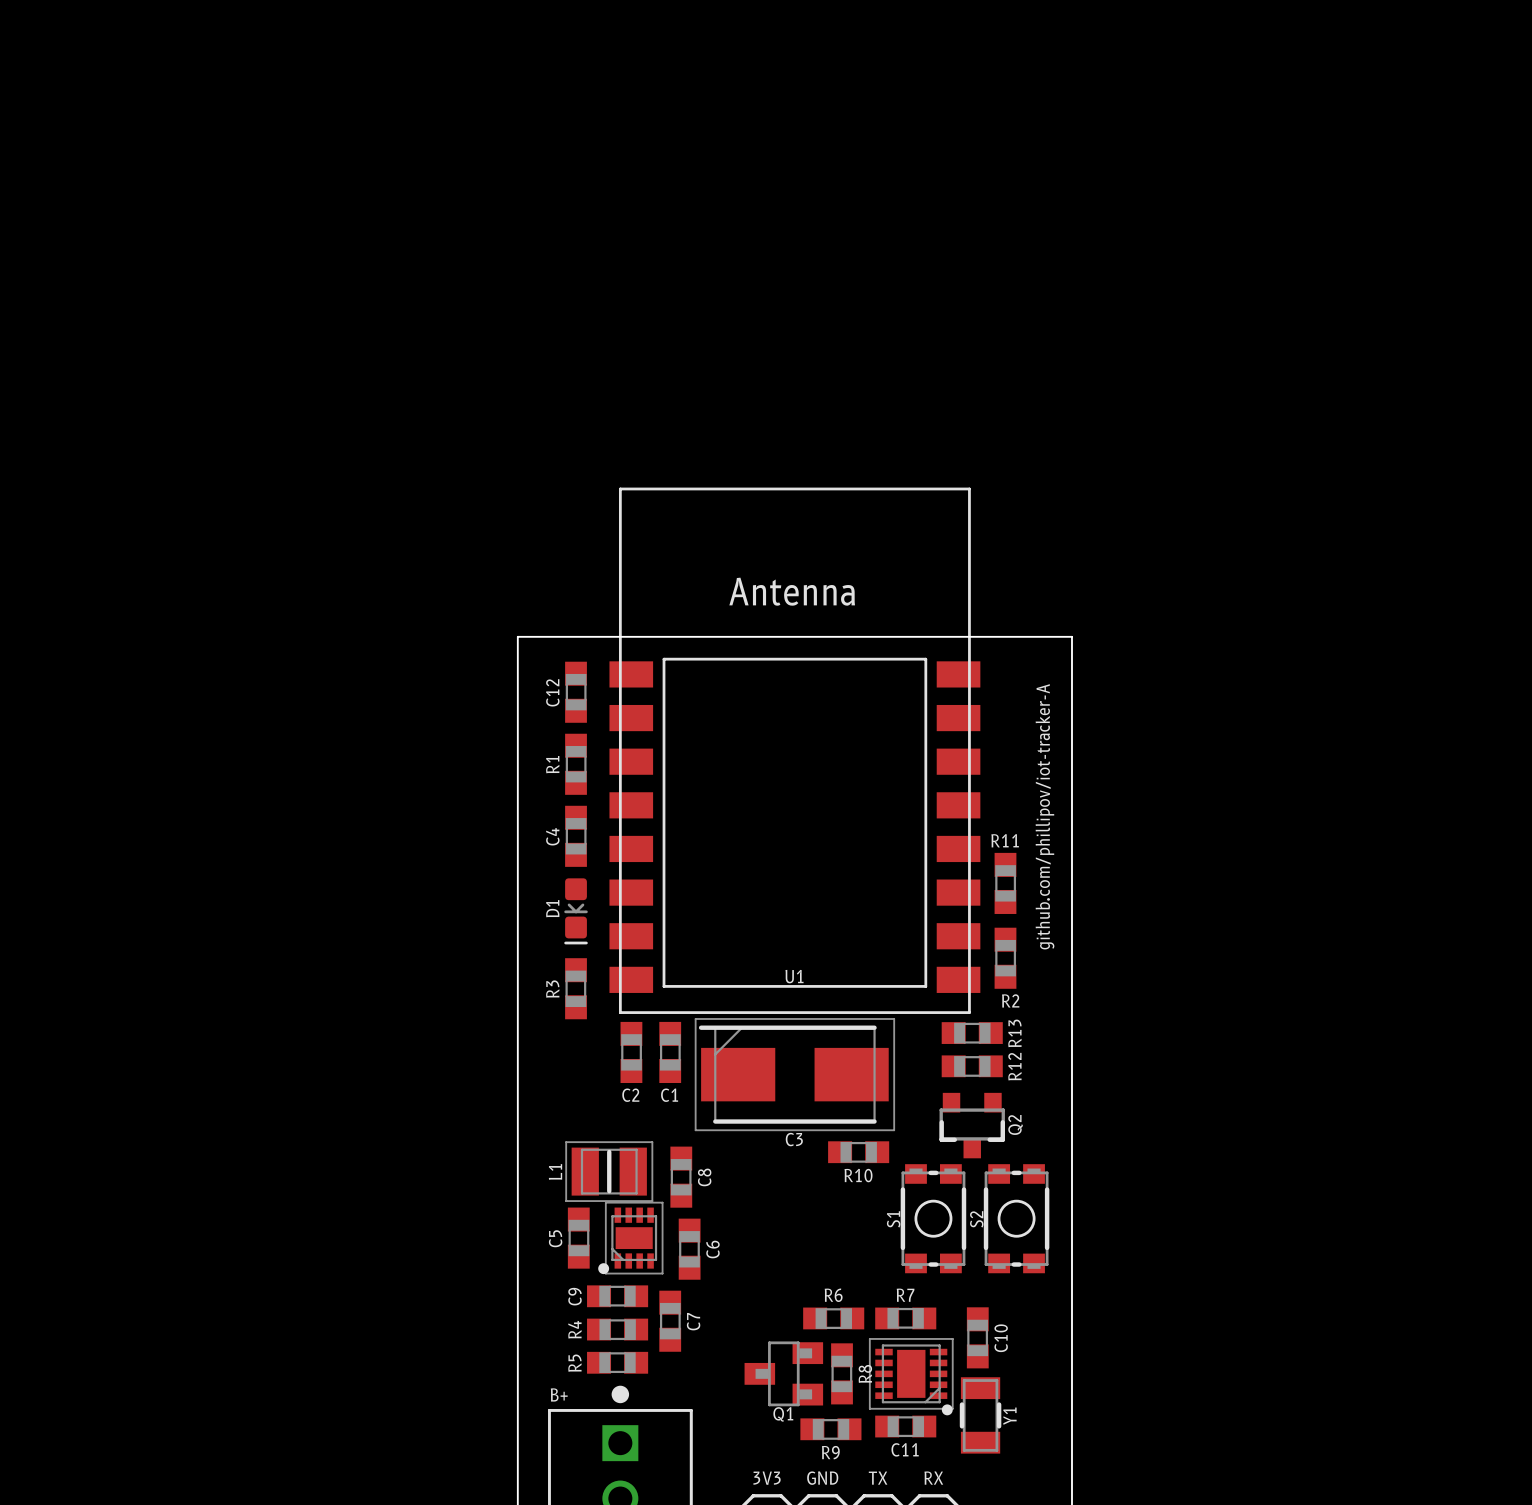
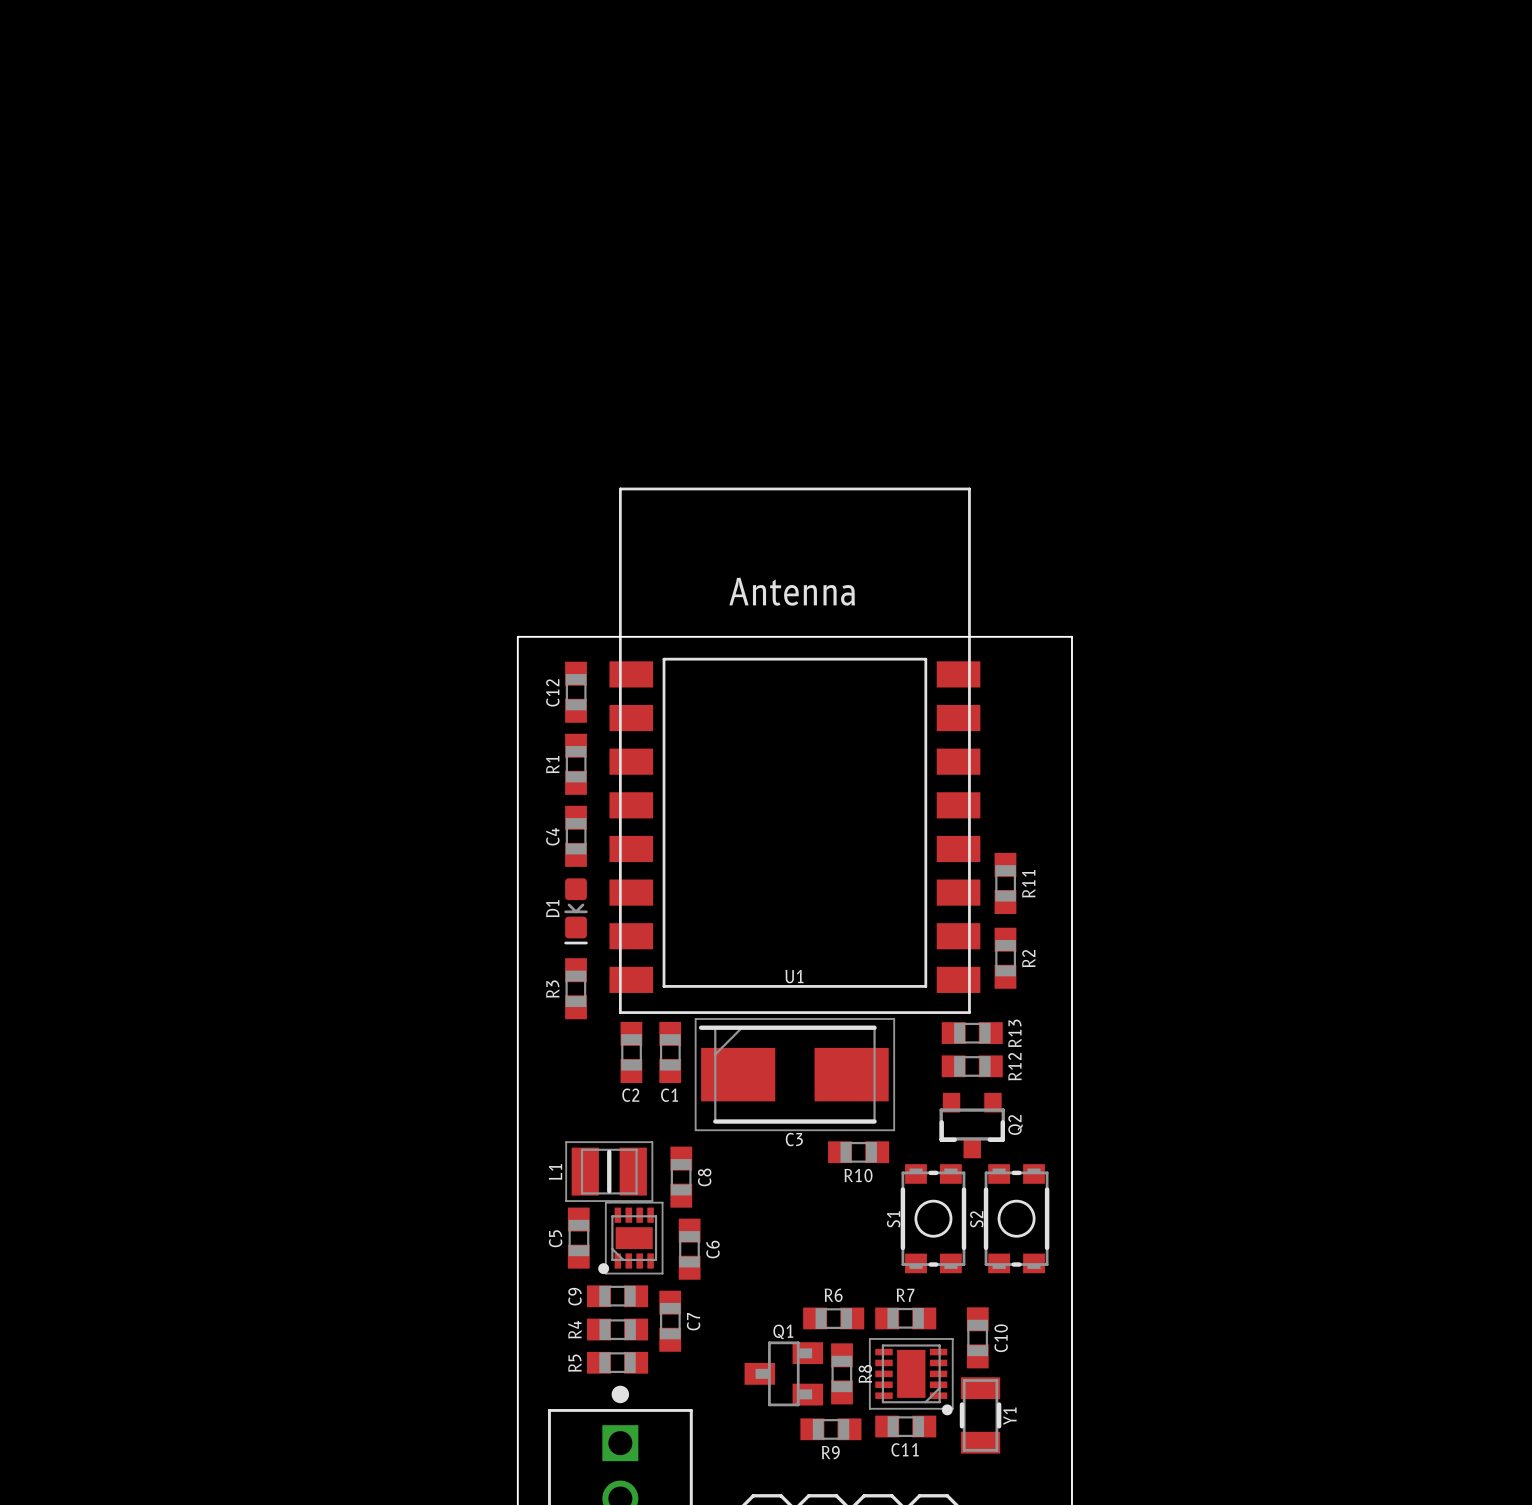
text: github.com/phillipov/iot-tracker-A (1044, 816) -> none
R11 name rotation: 0° (1005, 840) -> 90° counterclockwise (1028, 883)
R11 name position: R11 (1005, 840) -> R11 (1028, 883)
R2 name rotation: 0° (1010, 1000) -> 90° counterclockwise (1028, 958)
R2 name position: R2 (1010, 1000) -> R2 (1028, 958)
text: B+ (559, 1394) -> none
Q1 name position: Q1 (783, 1414) -> Q1 (783, 1331)
text: 3V3 (767, 1478) -> none
text: GND (822, 1478) -> none
text: TX (878, 1478) -> none
text: RX (933, 1478) -> none

